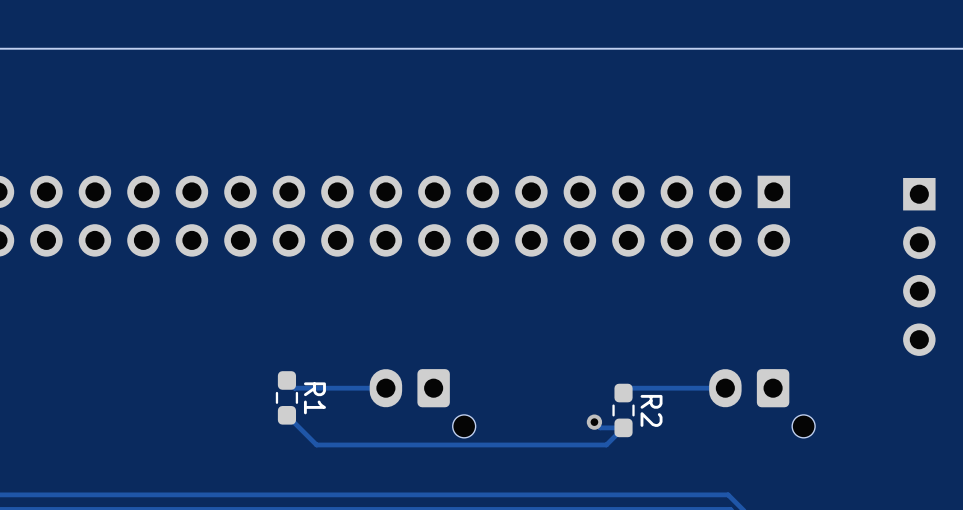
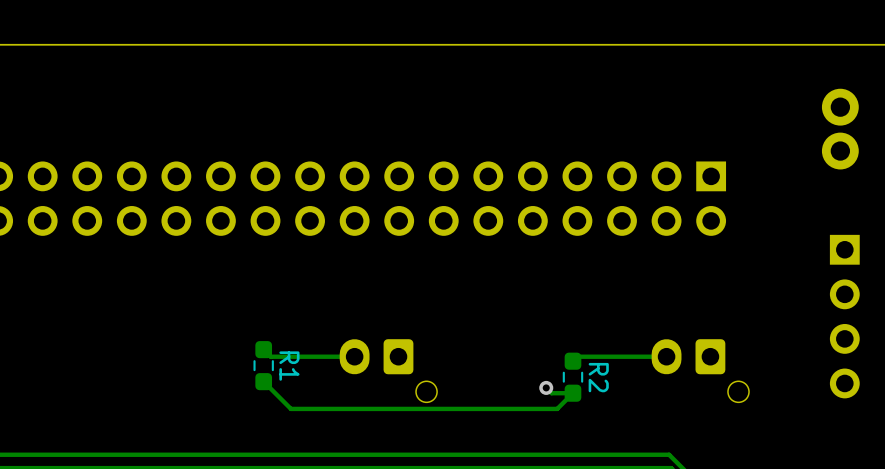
part: none -> (840, 129)
part position: (919, 266) -> (844, 316)

